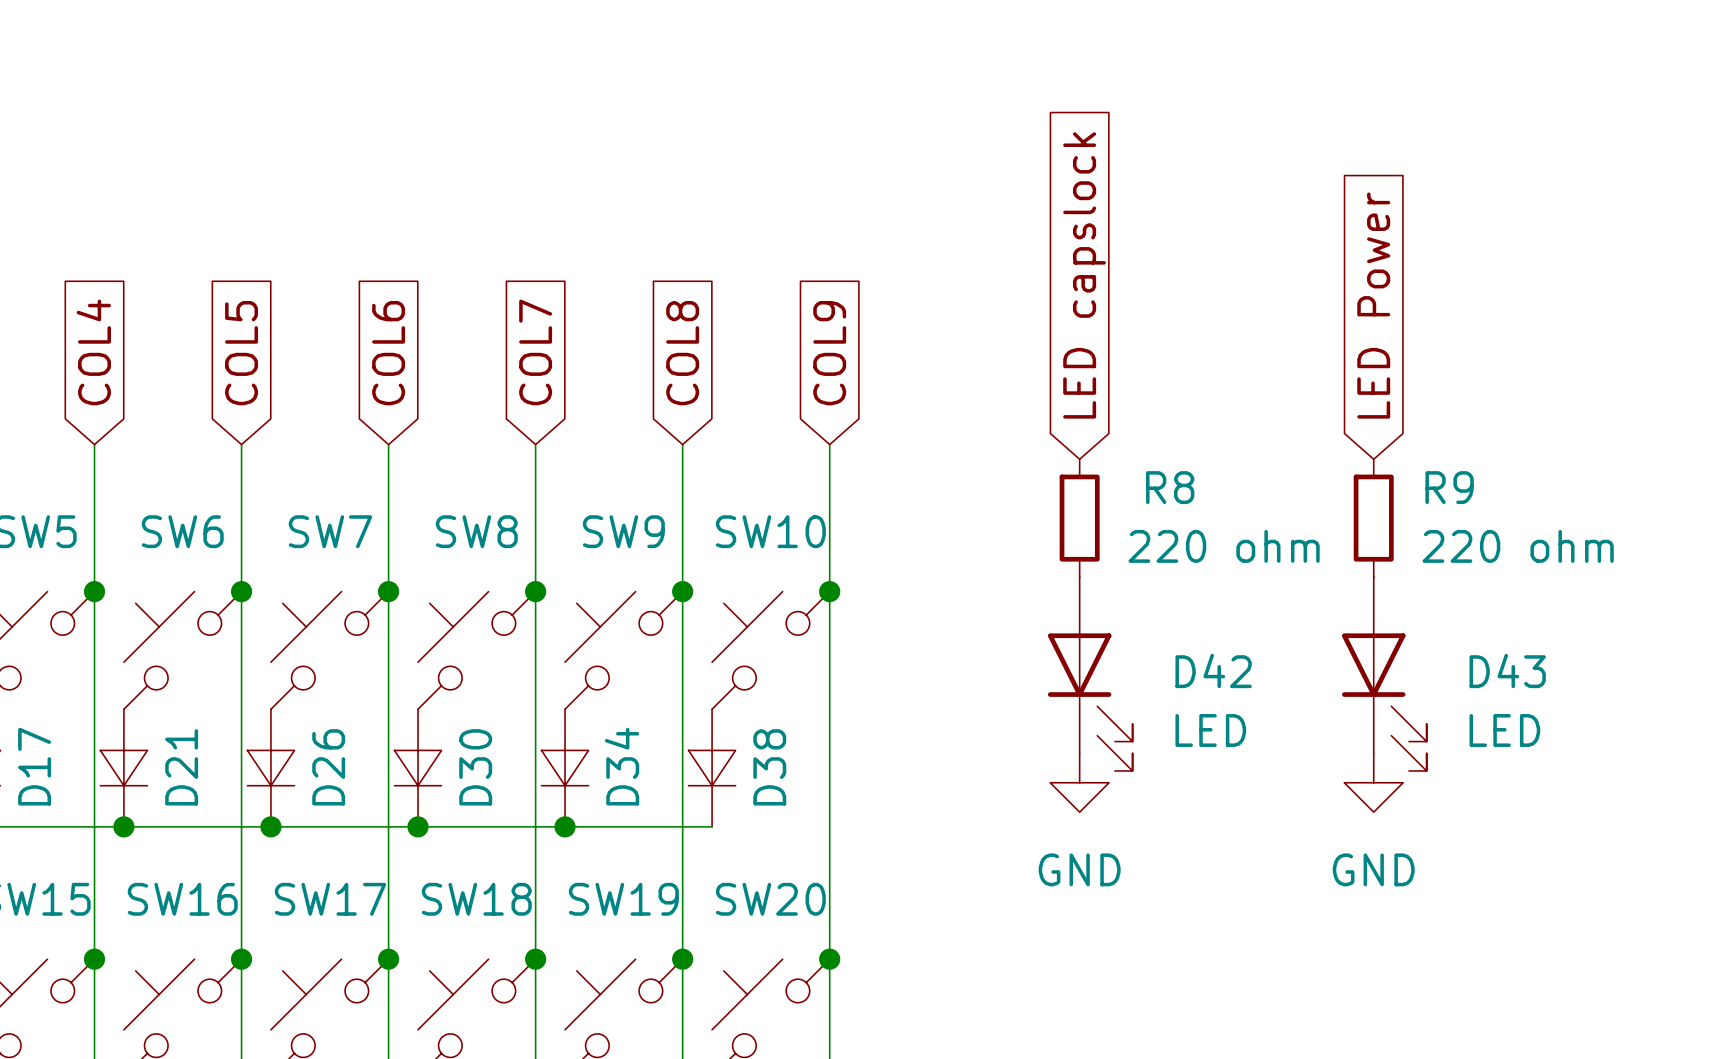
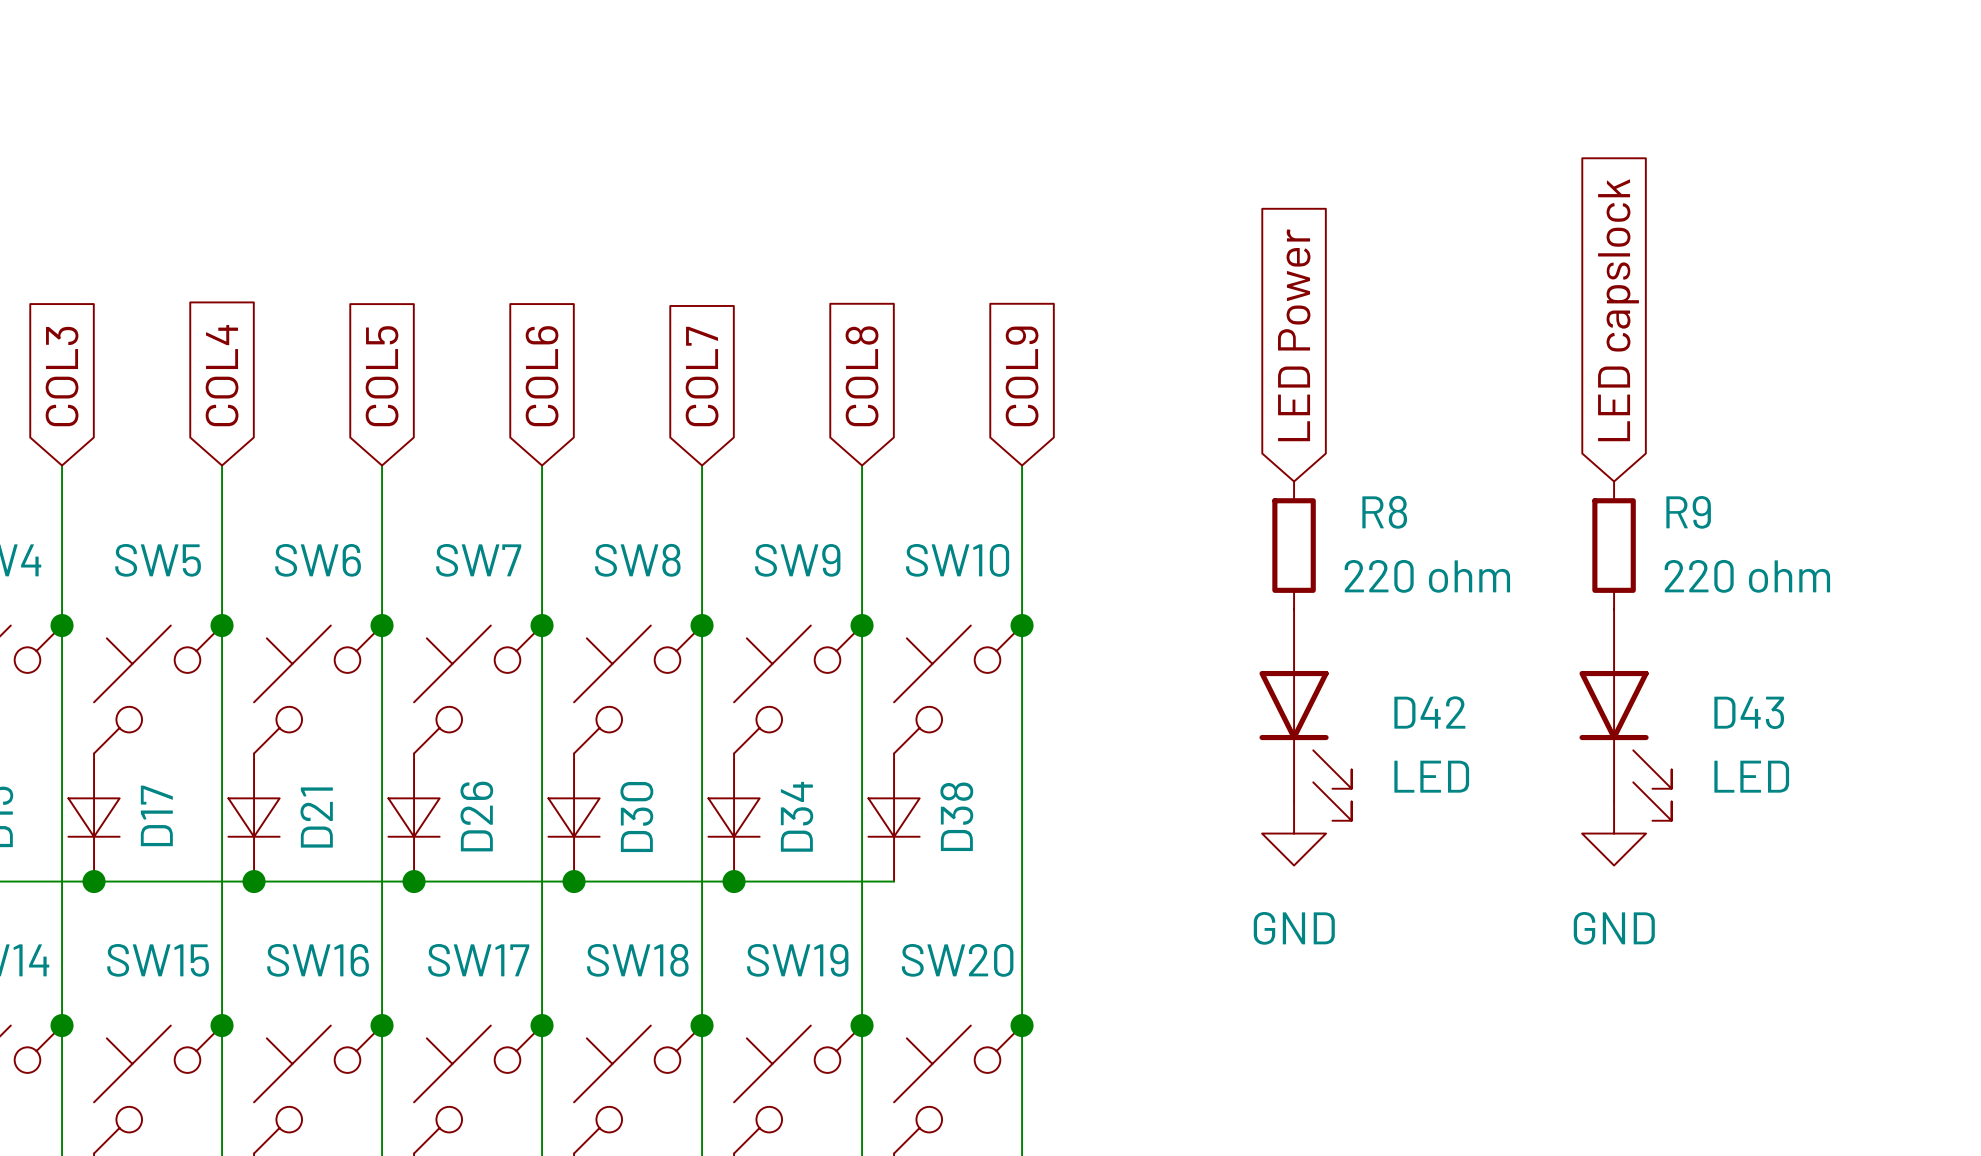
global label: LED capslock (1084, 275) -> LED Power (1294, 335)
global label: LED Power (1373, 305) -> LED capslock (1618, 310)

